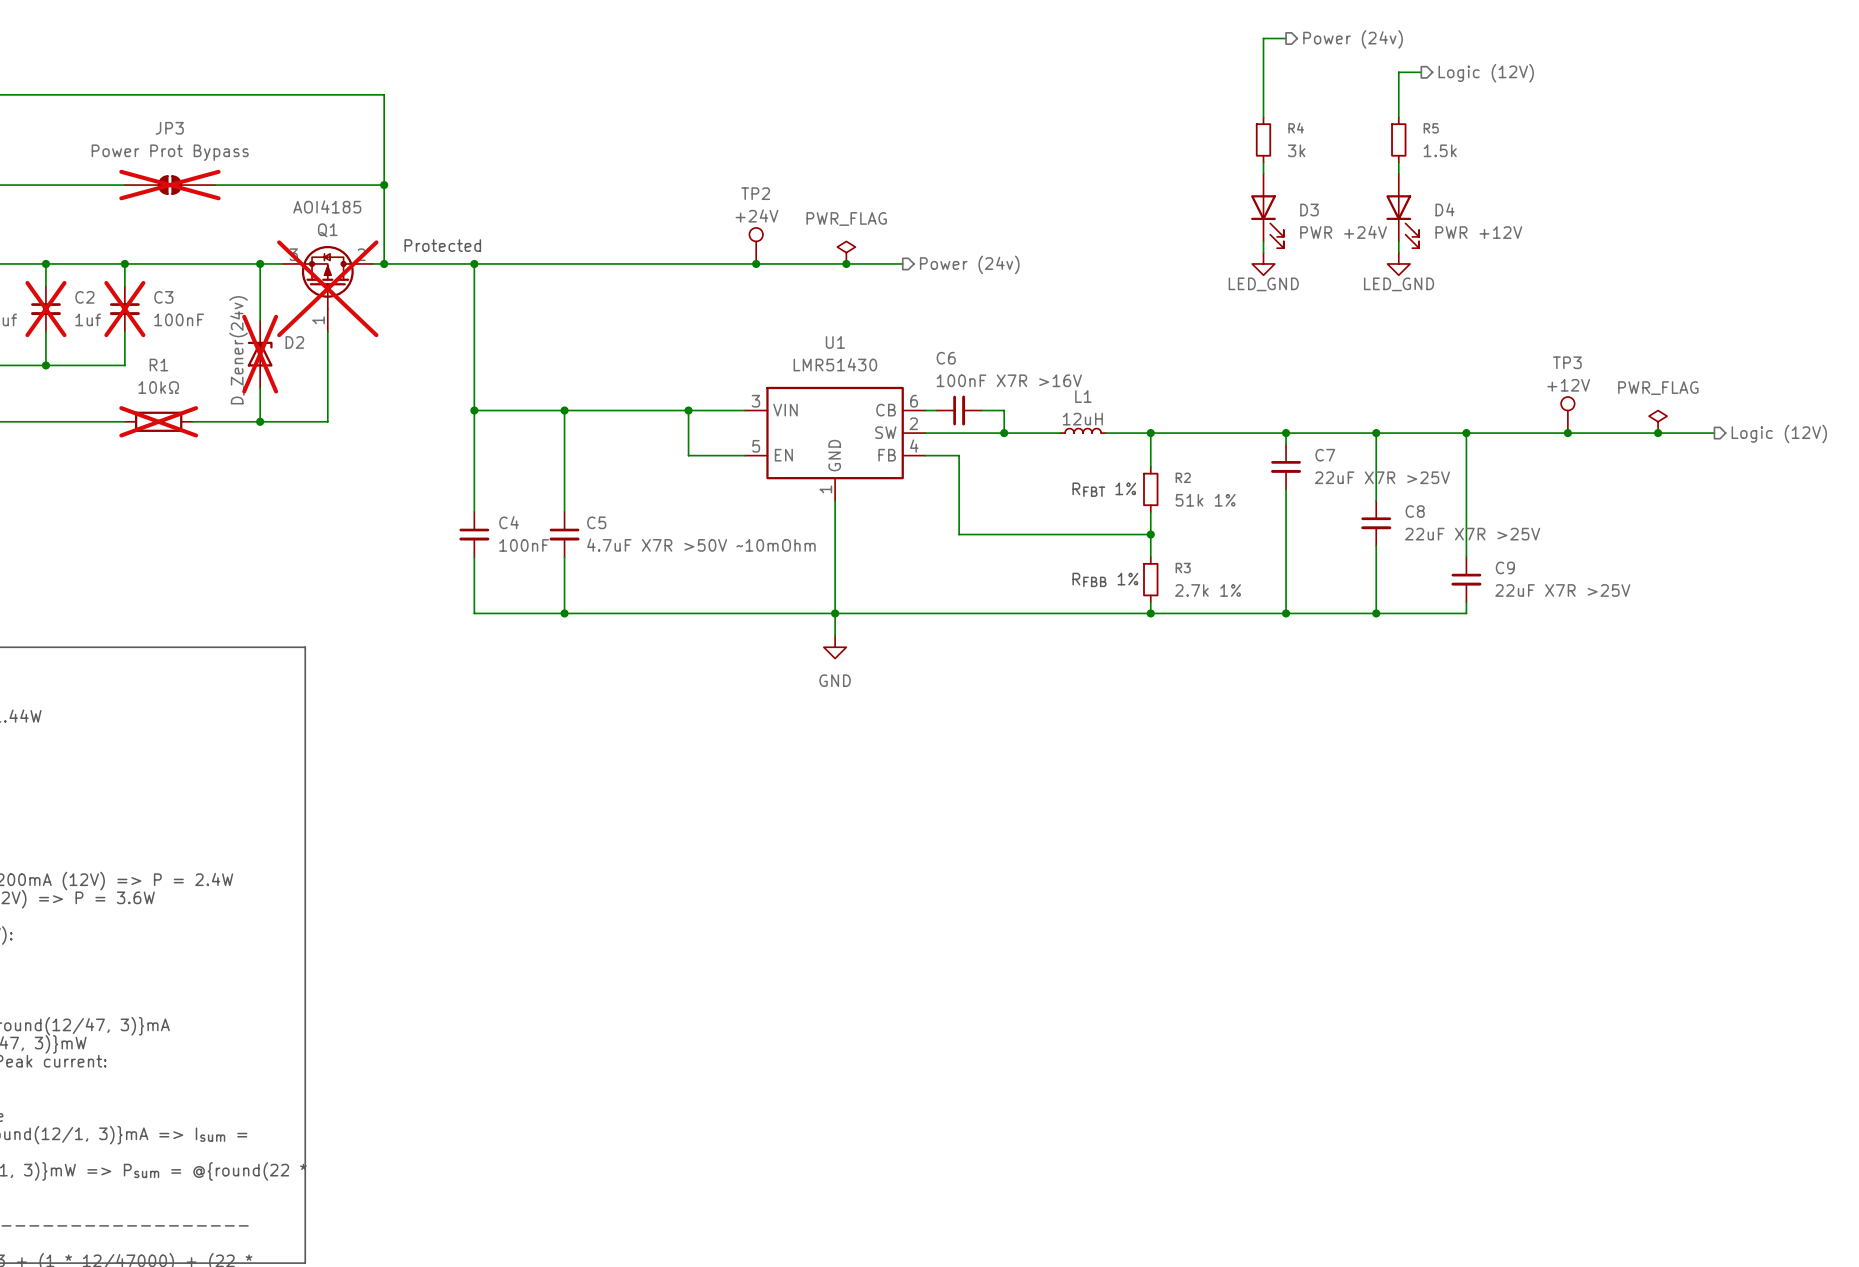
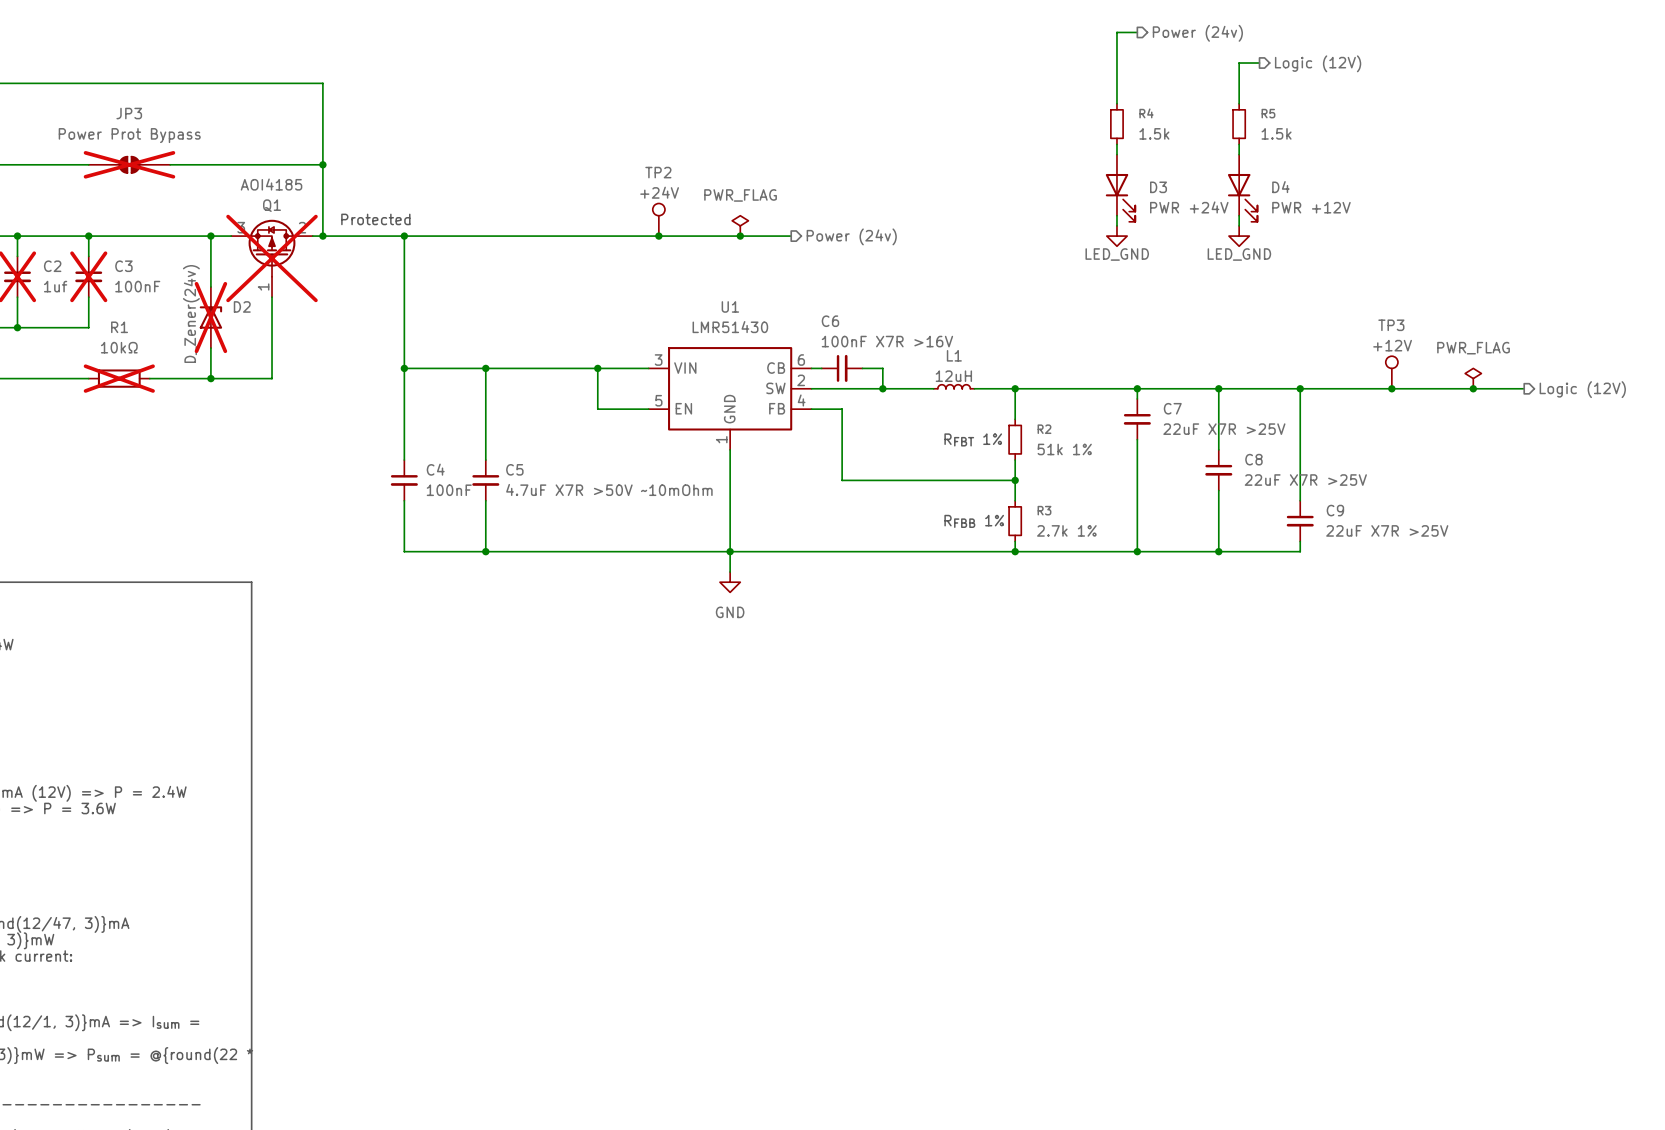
R4 value: 3k (1296, 150) -> 1.5k (1154, 133)

